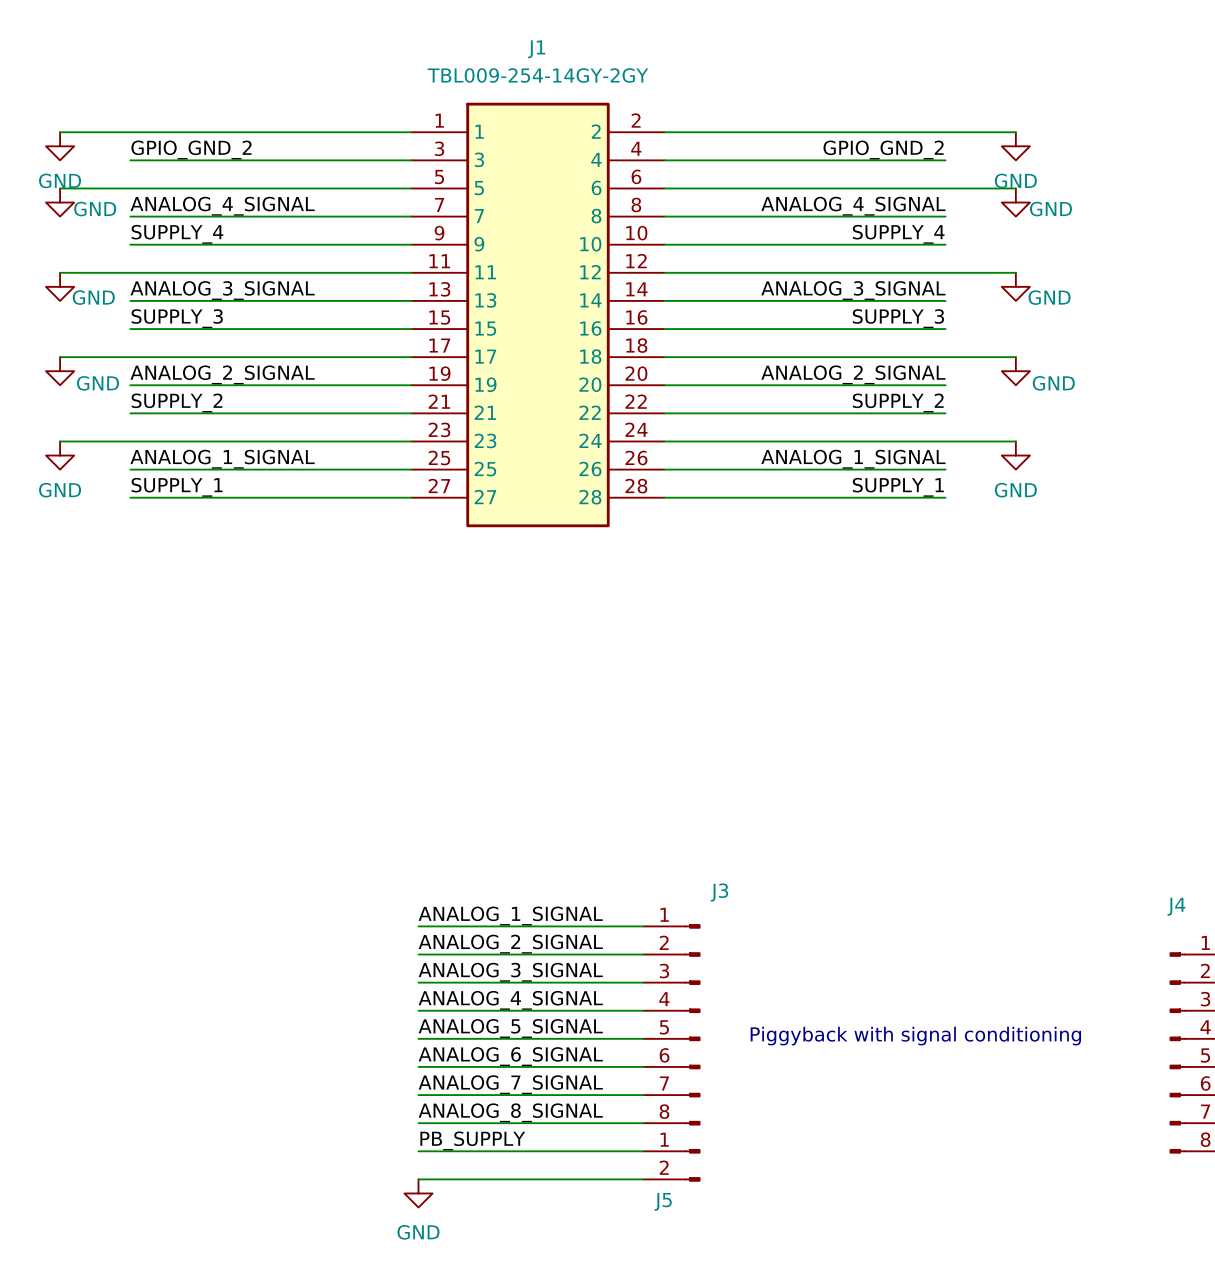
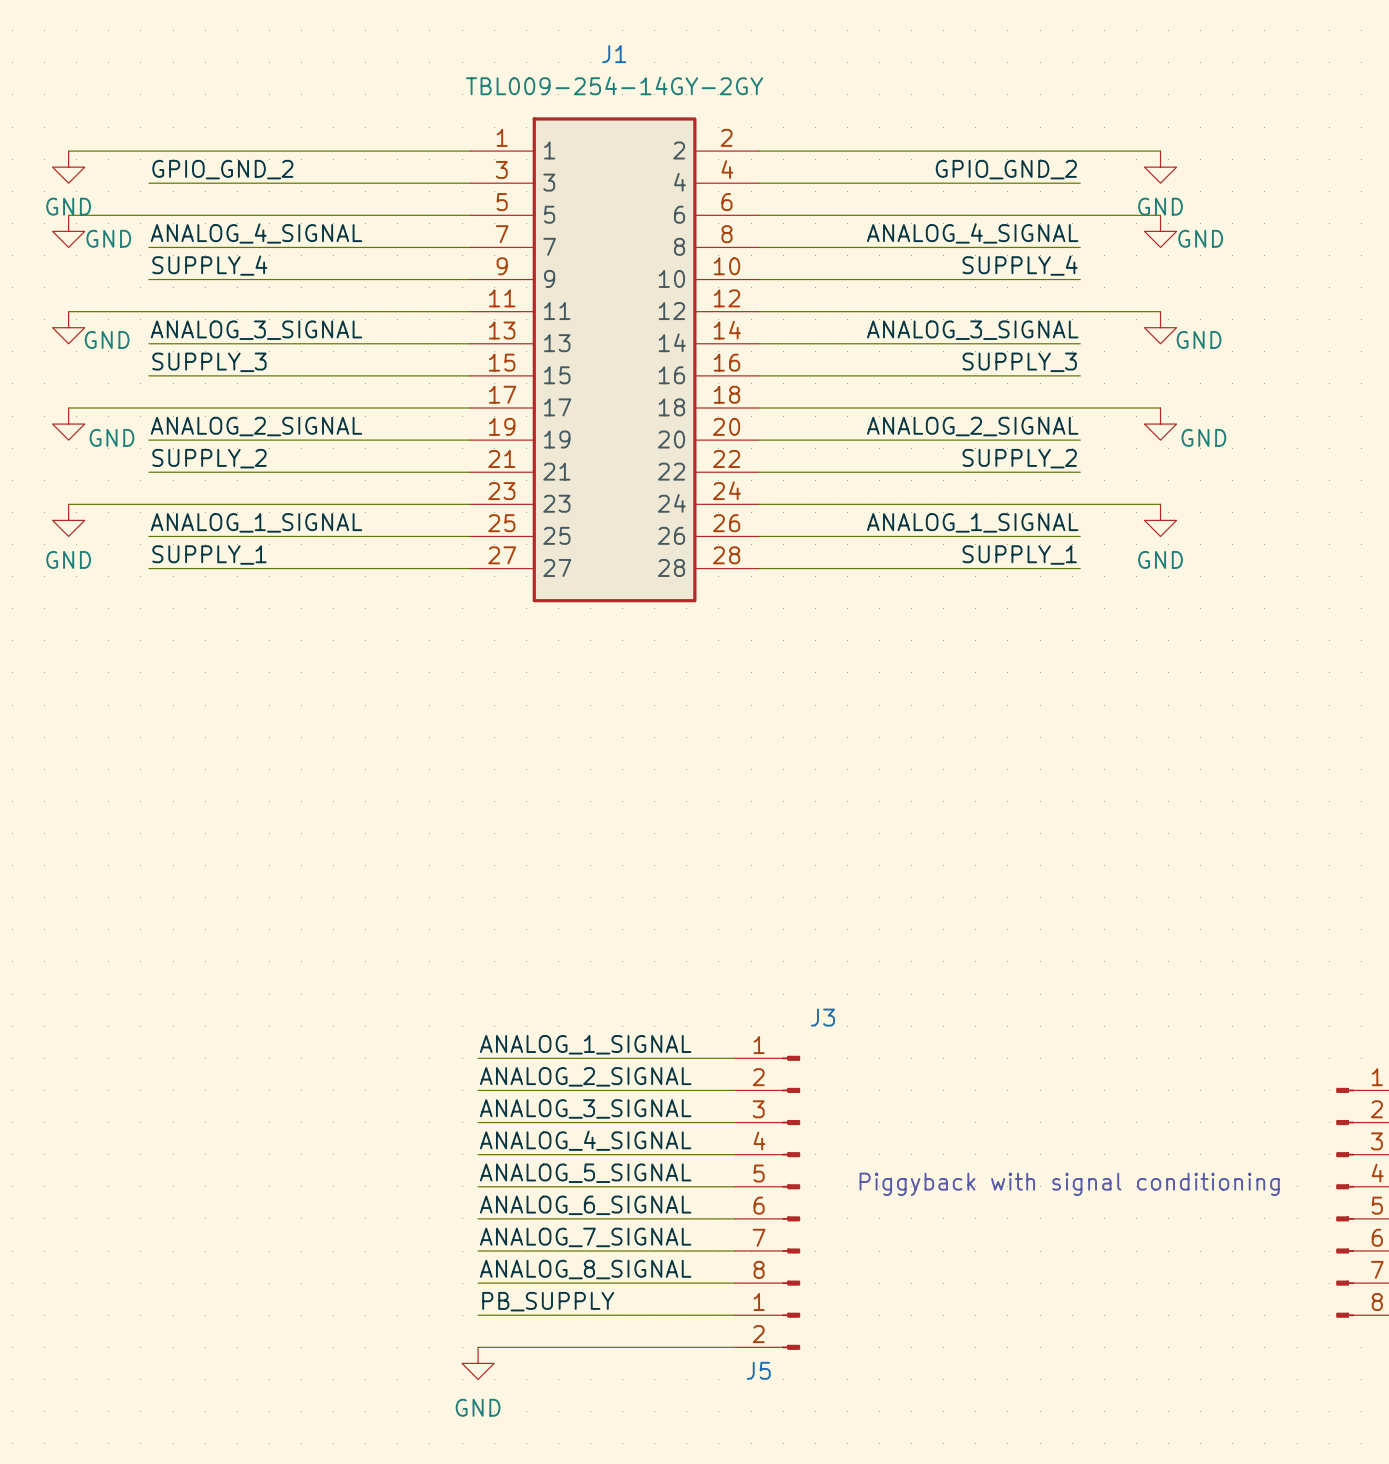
J4 name: J4 (1176, 906) -> none

